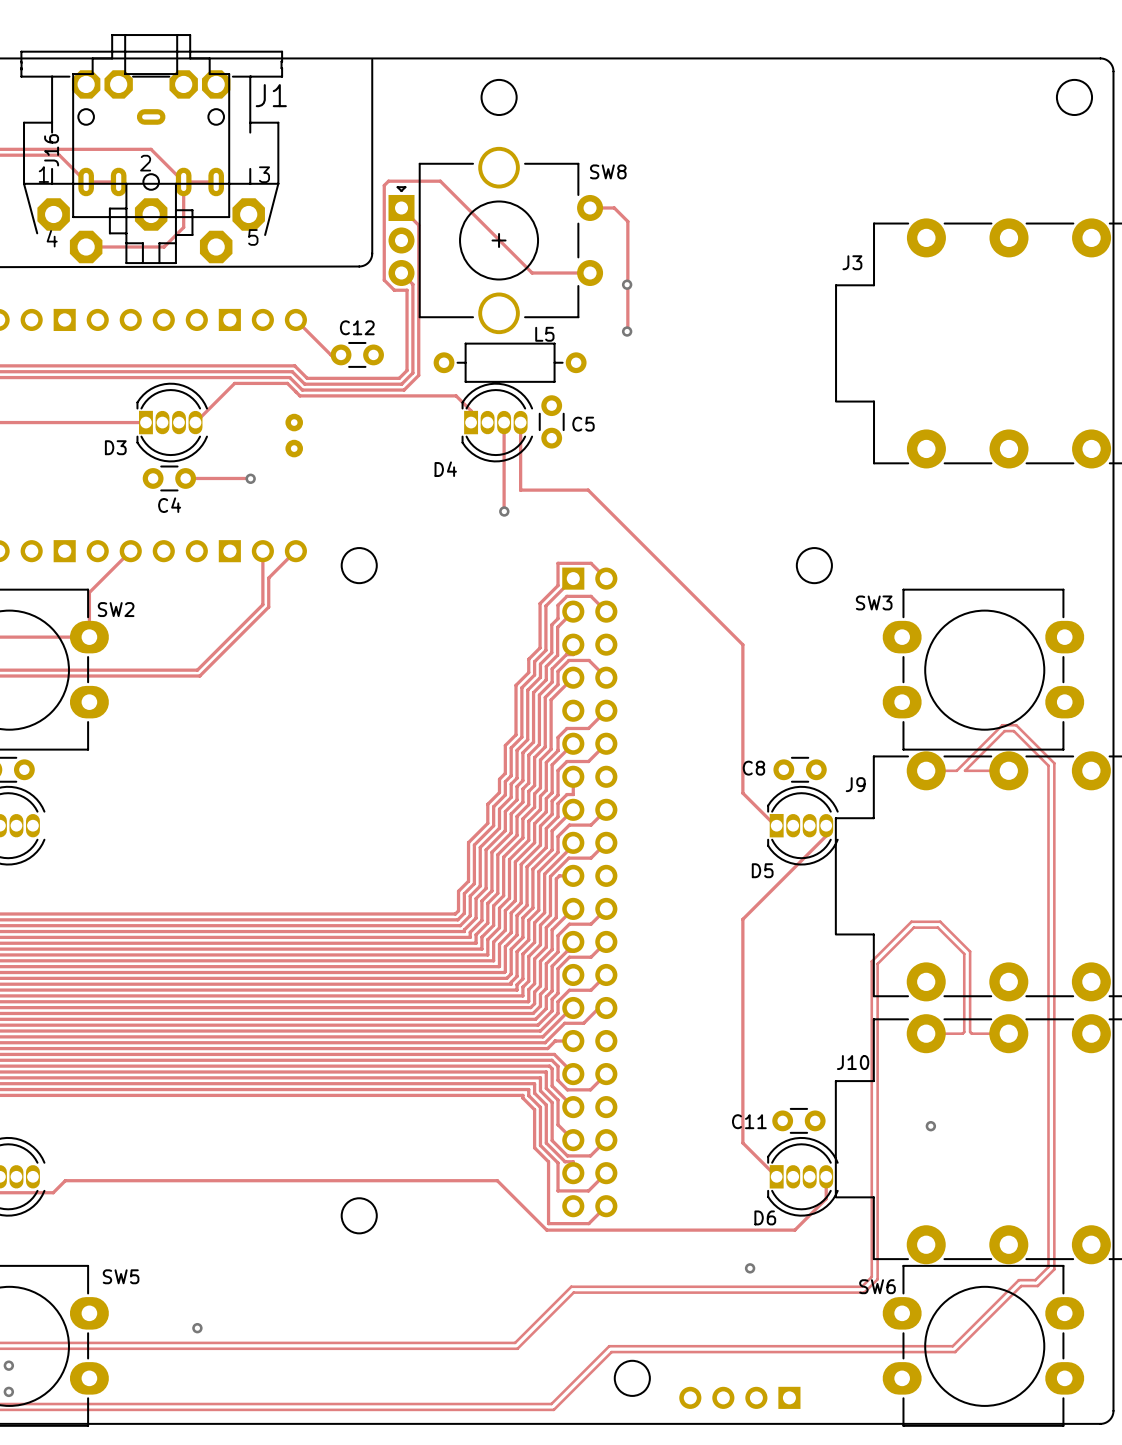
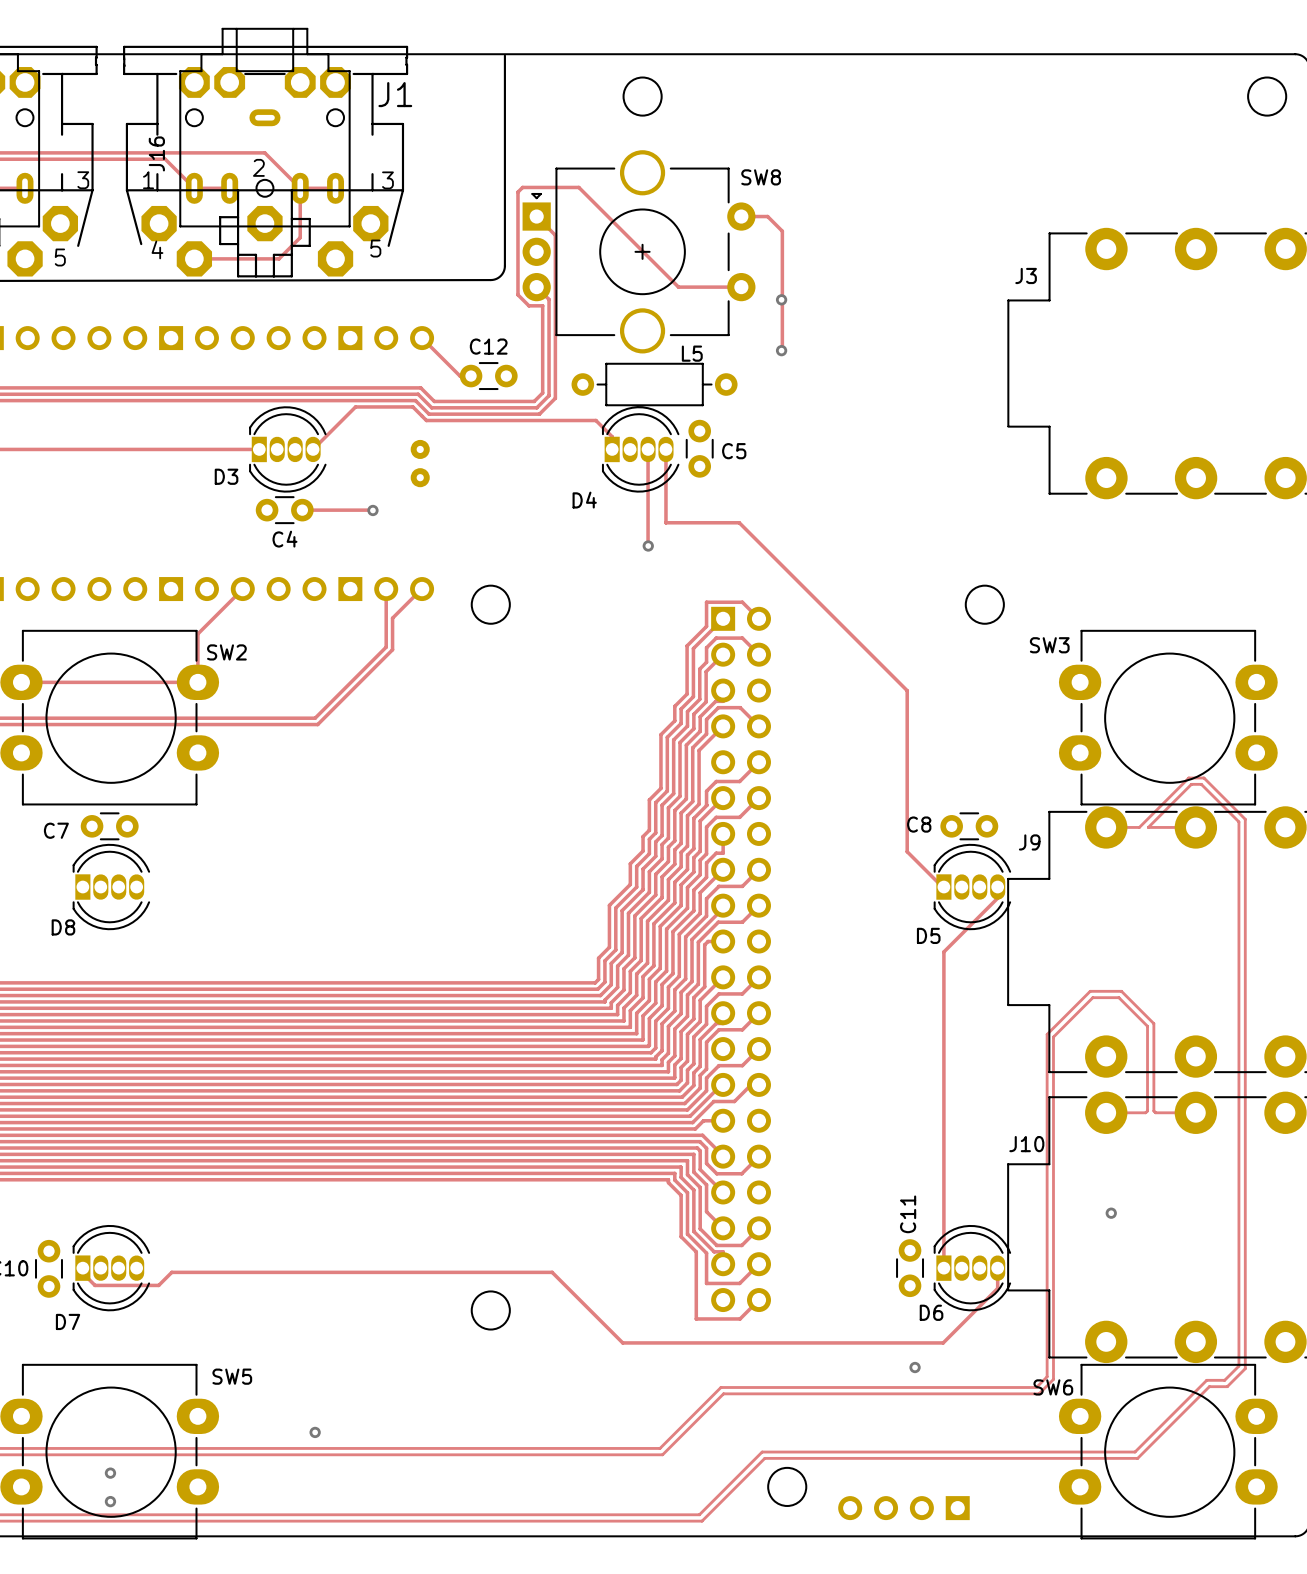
track: (776, 885) (742, 919) (742, 1142) (776, 1176) -> (943, 951) (943, 1268)
C11 rotation: 0° (798, 1120) -> 90° clockwise (910, 1268)
C11 position: (798, 1120) -> (910, 1268)
track: (415, 1180) (497, 1180) (546, 1230) (794, 1230) (826, 1198) (826, 1195) -> (552, 1272) (622, 1342) (943, 1342) (997, 1288)

